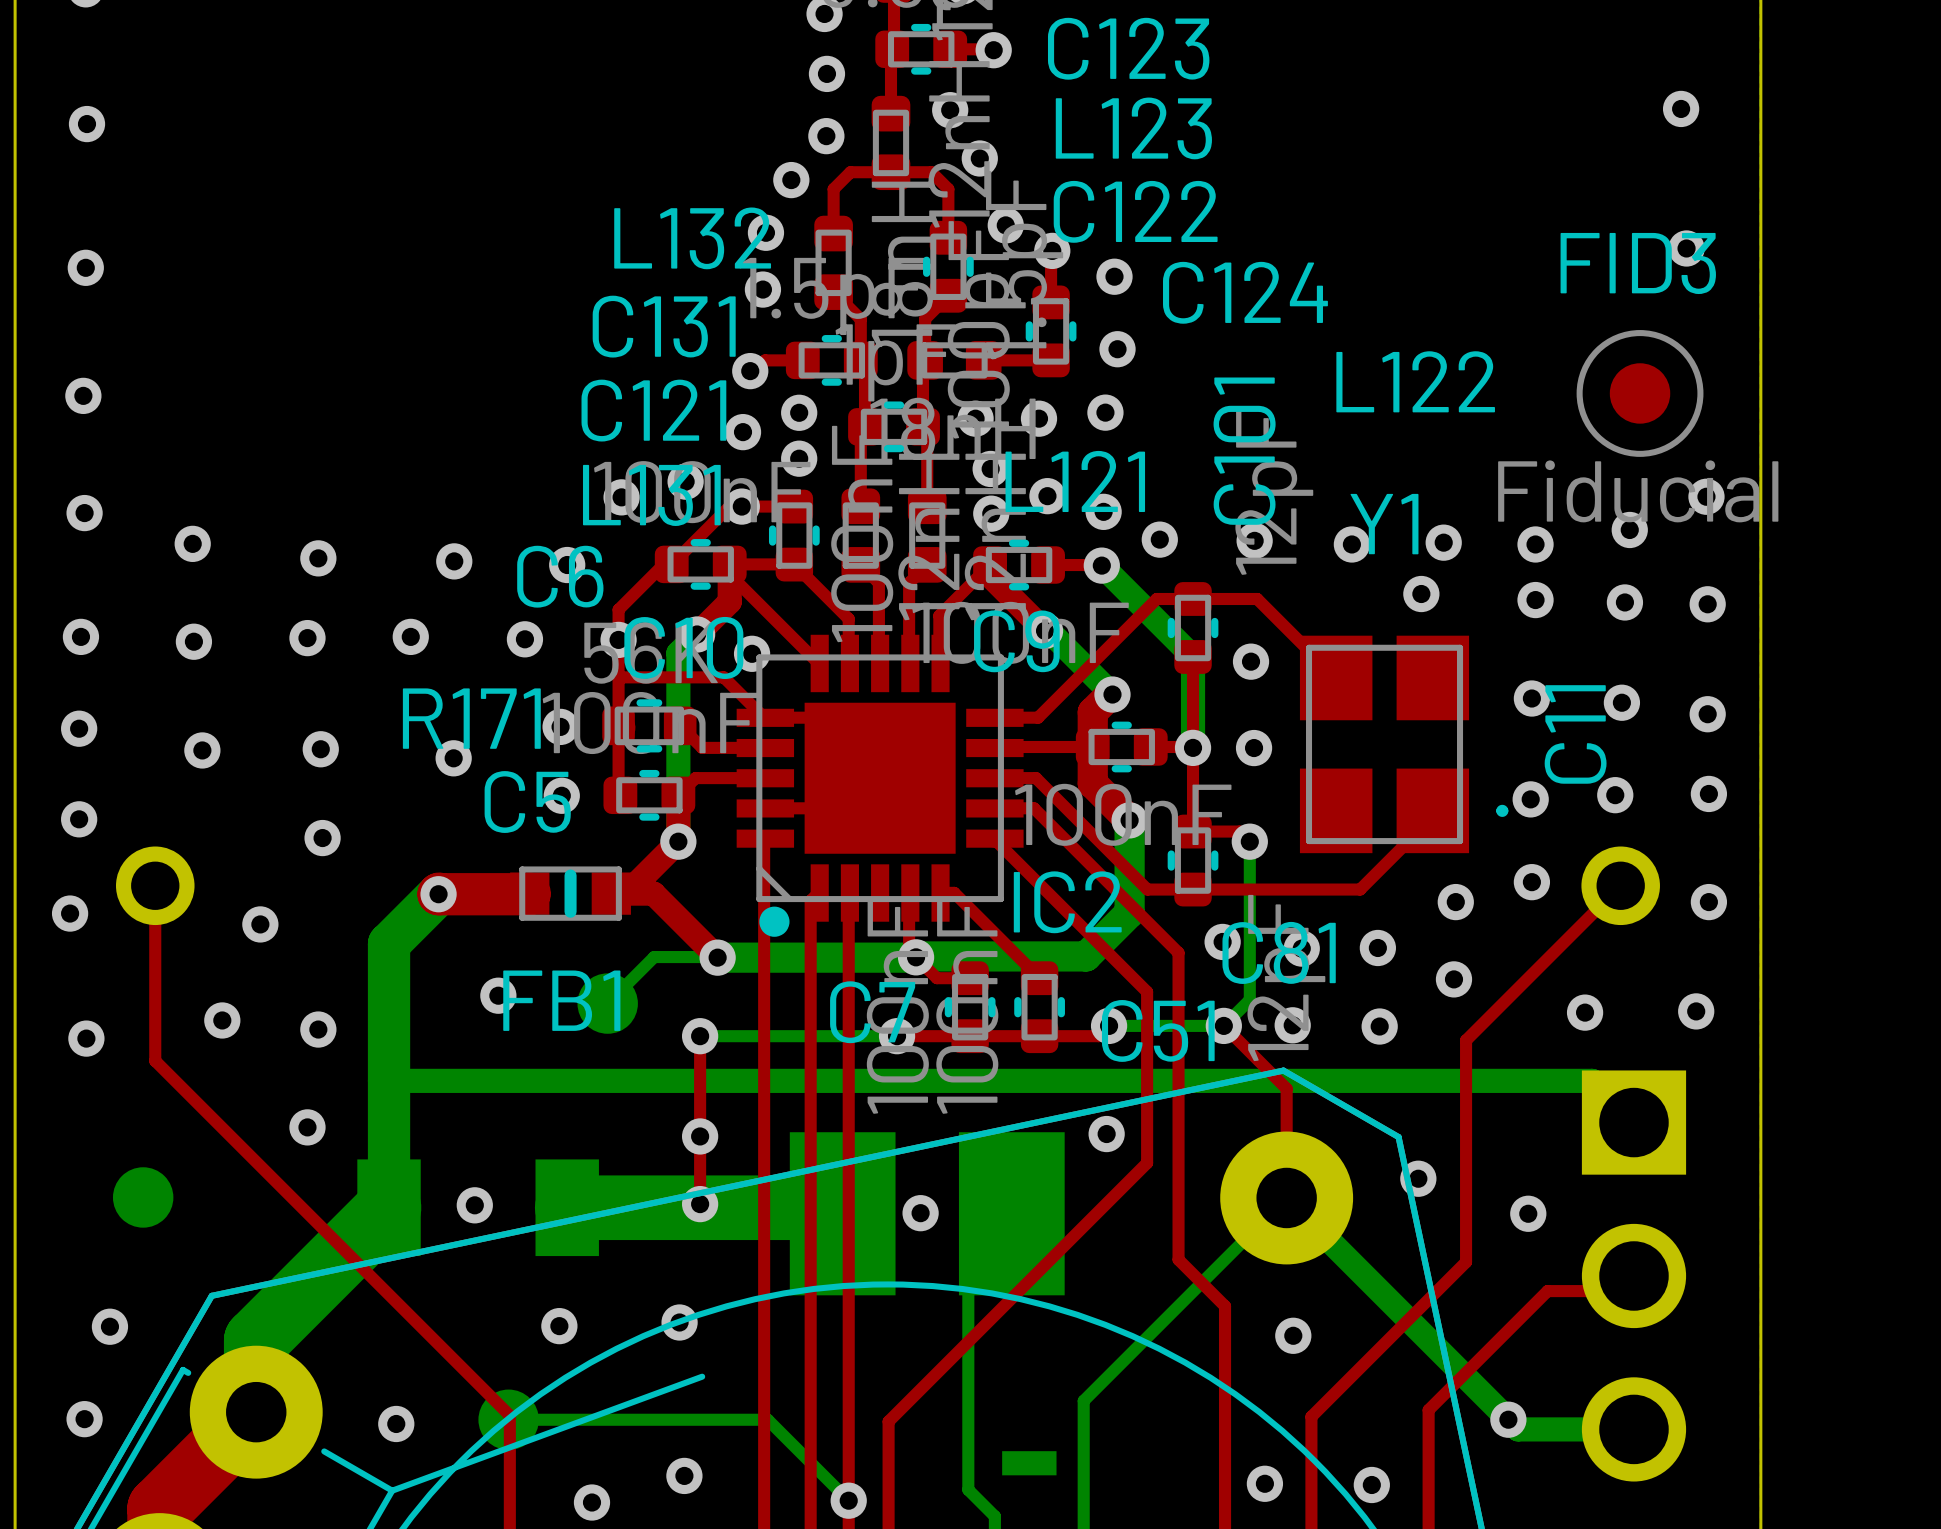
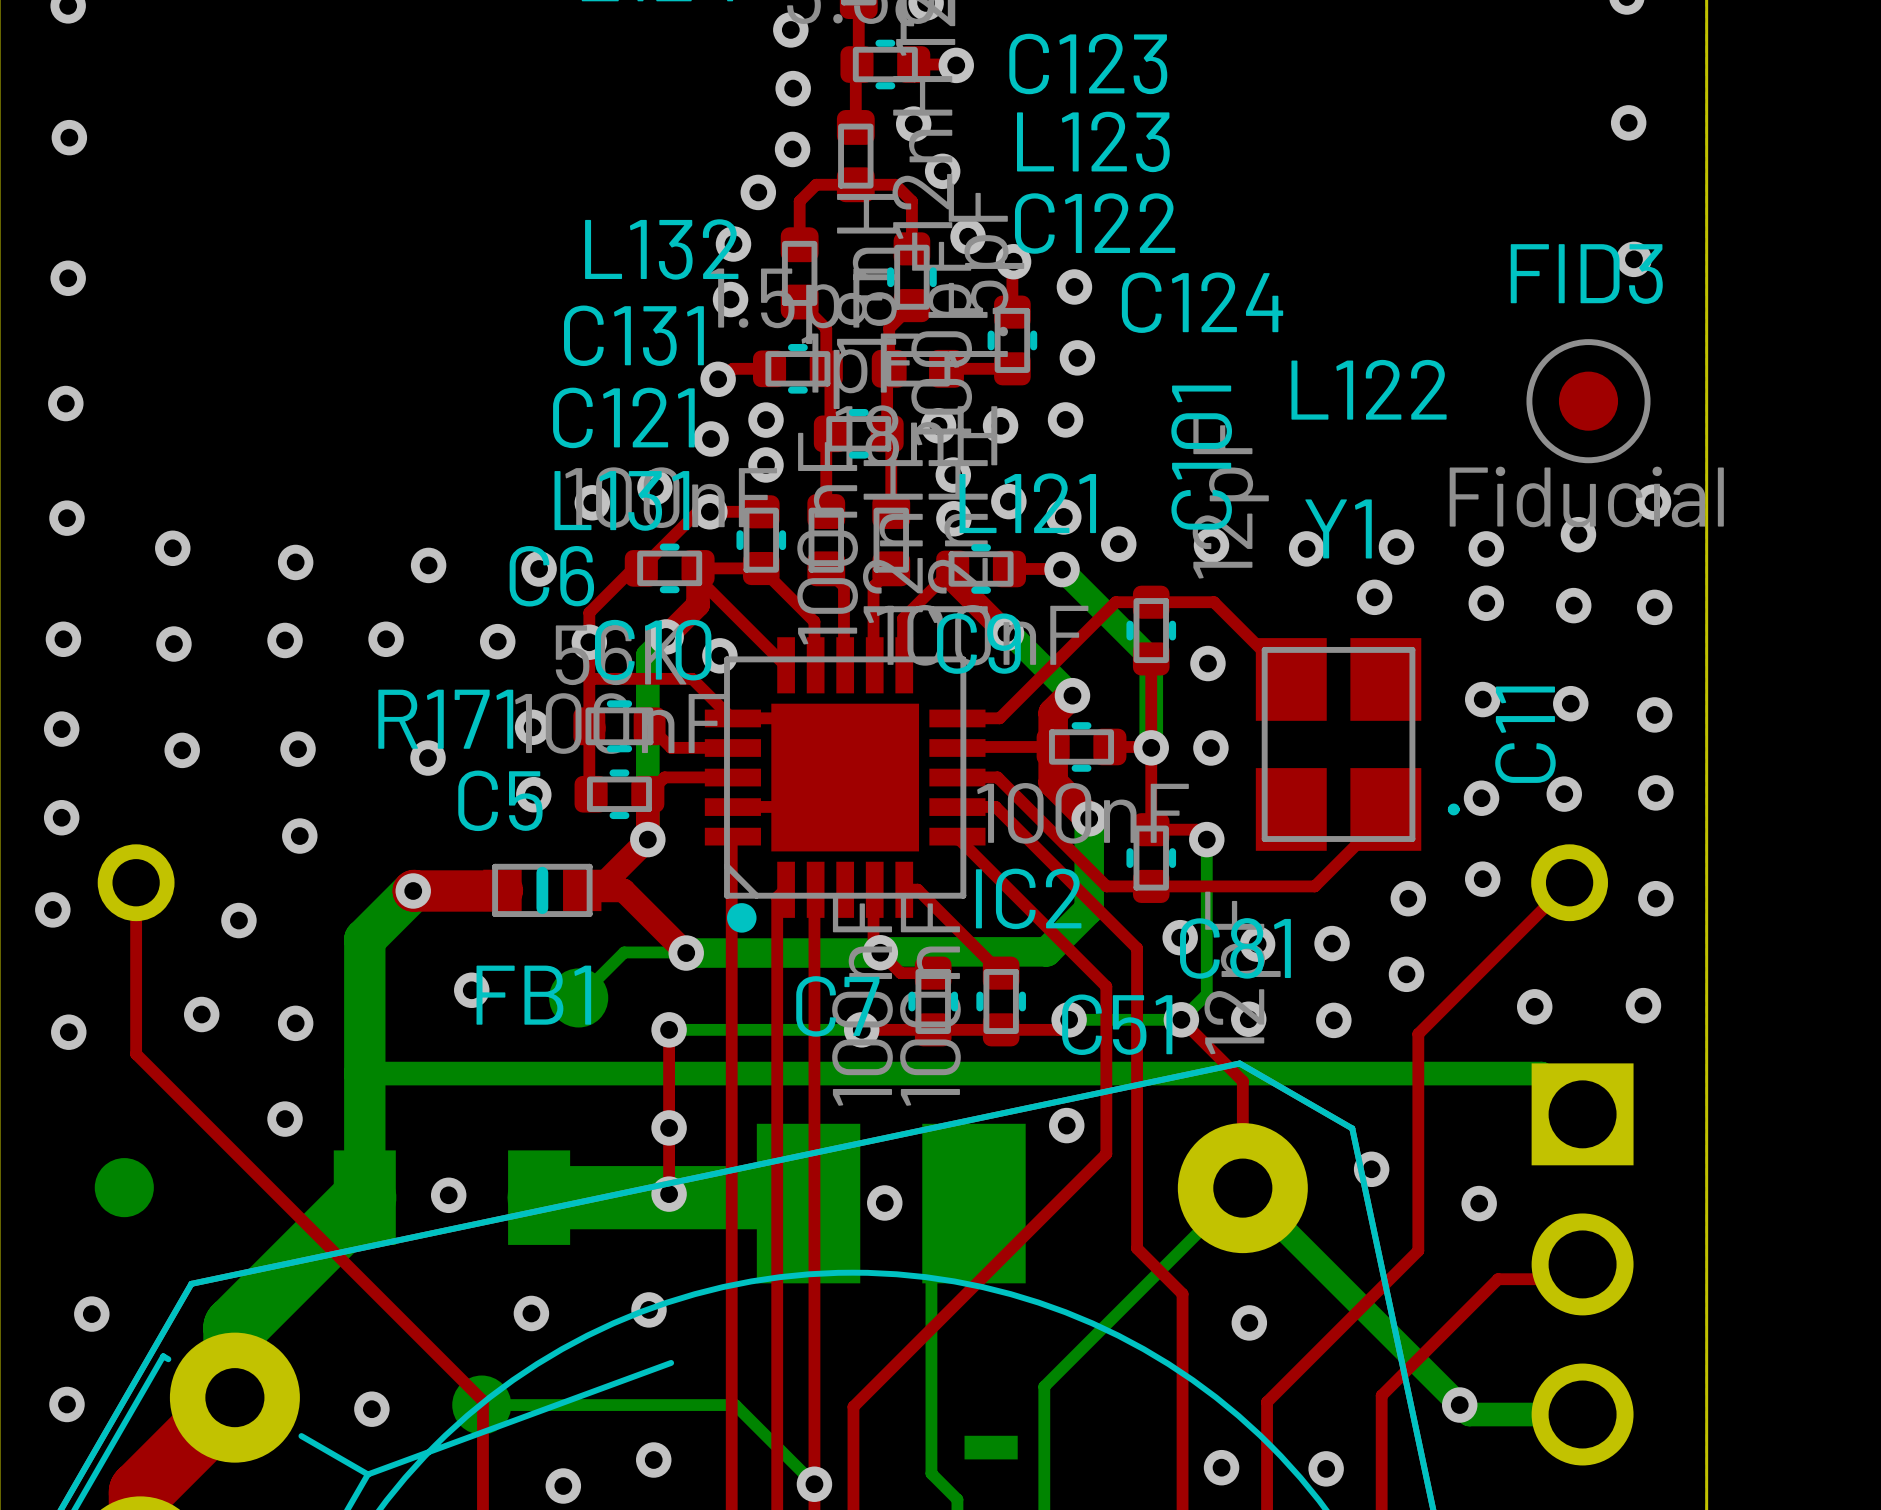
L121 name position: L121 (1075, 481) -> L121 (1027, 503)
C6 name position: C6 (560, 576) -> C6 (551, 576)

